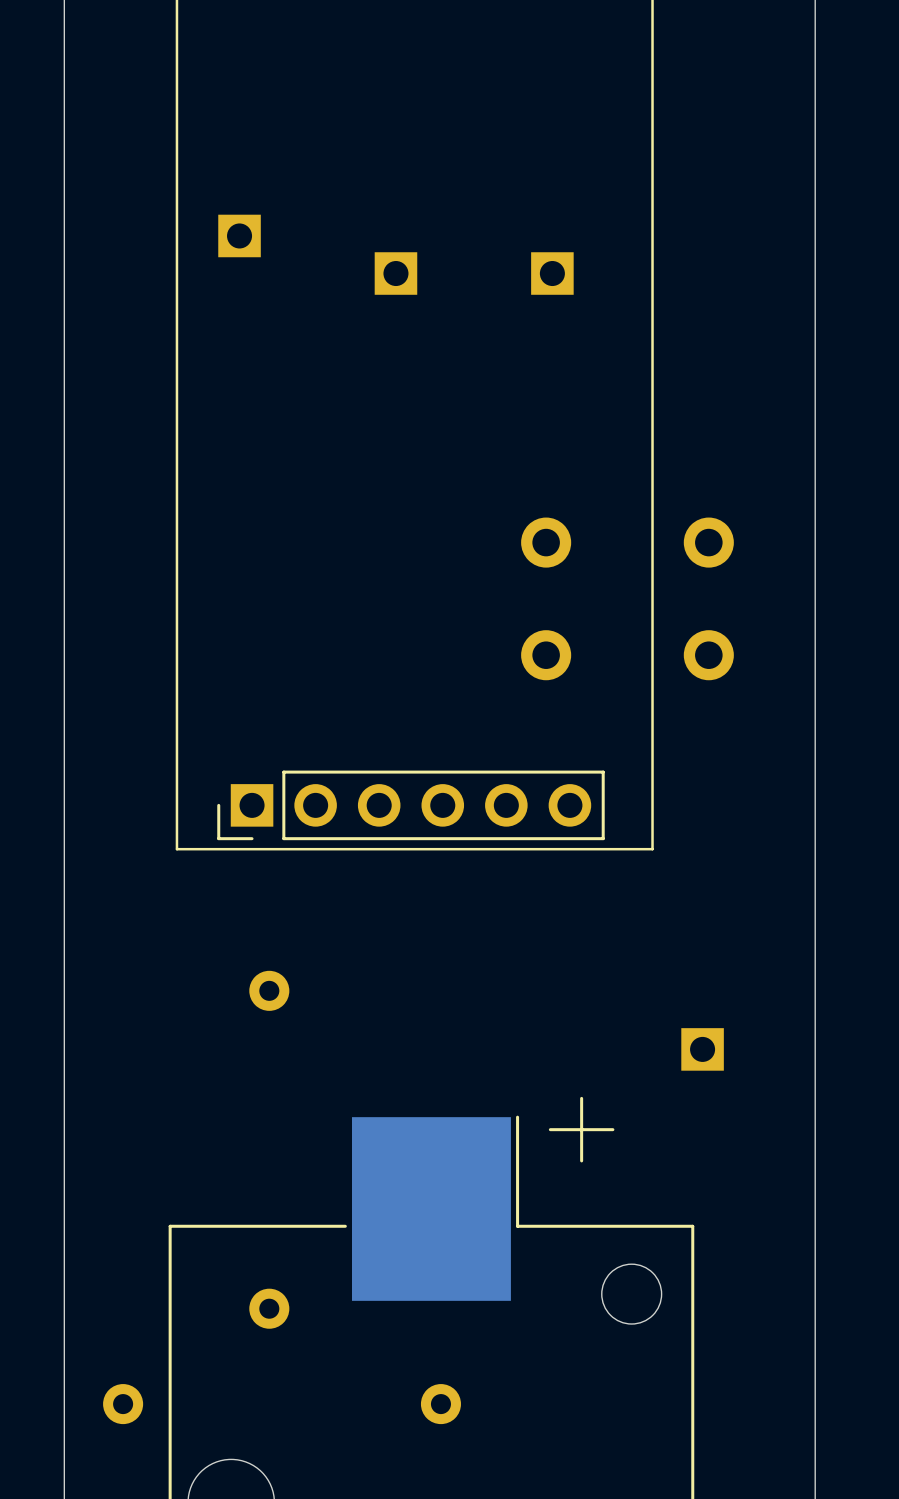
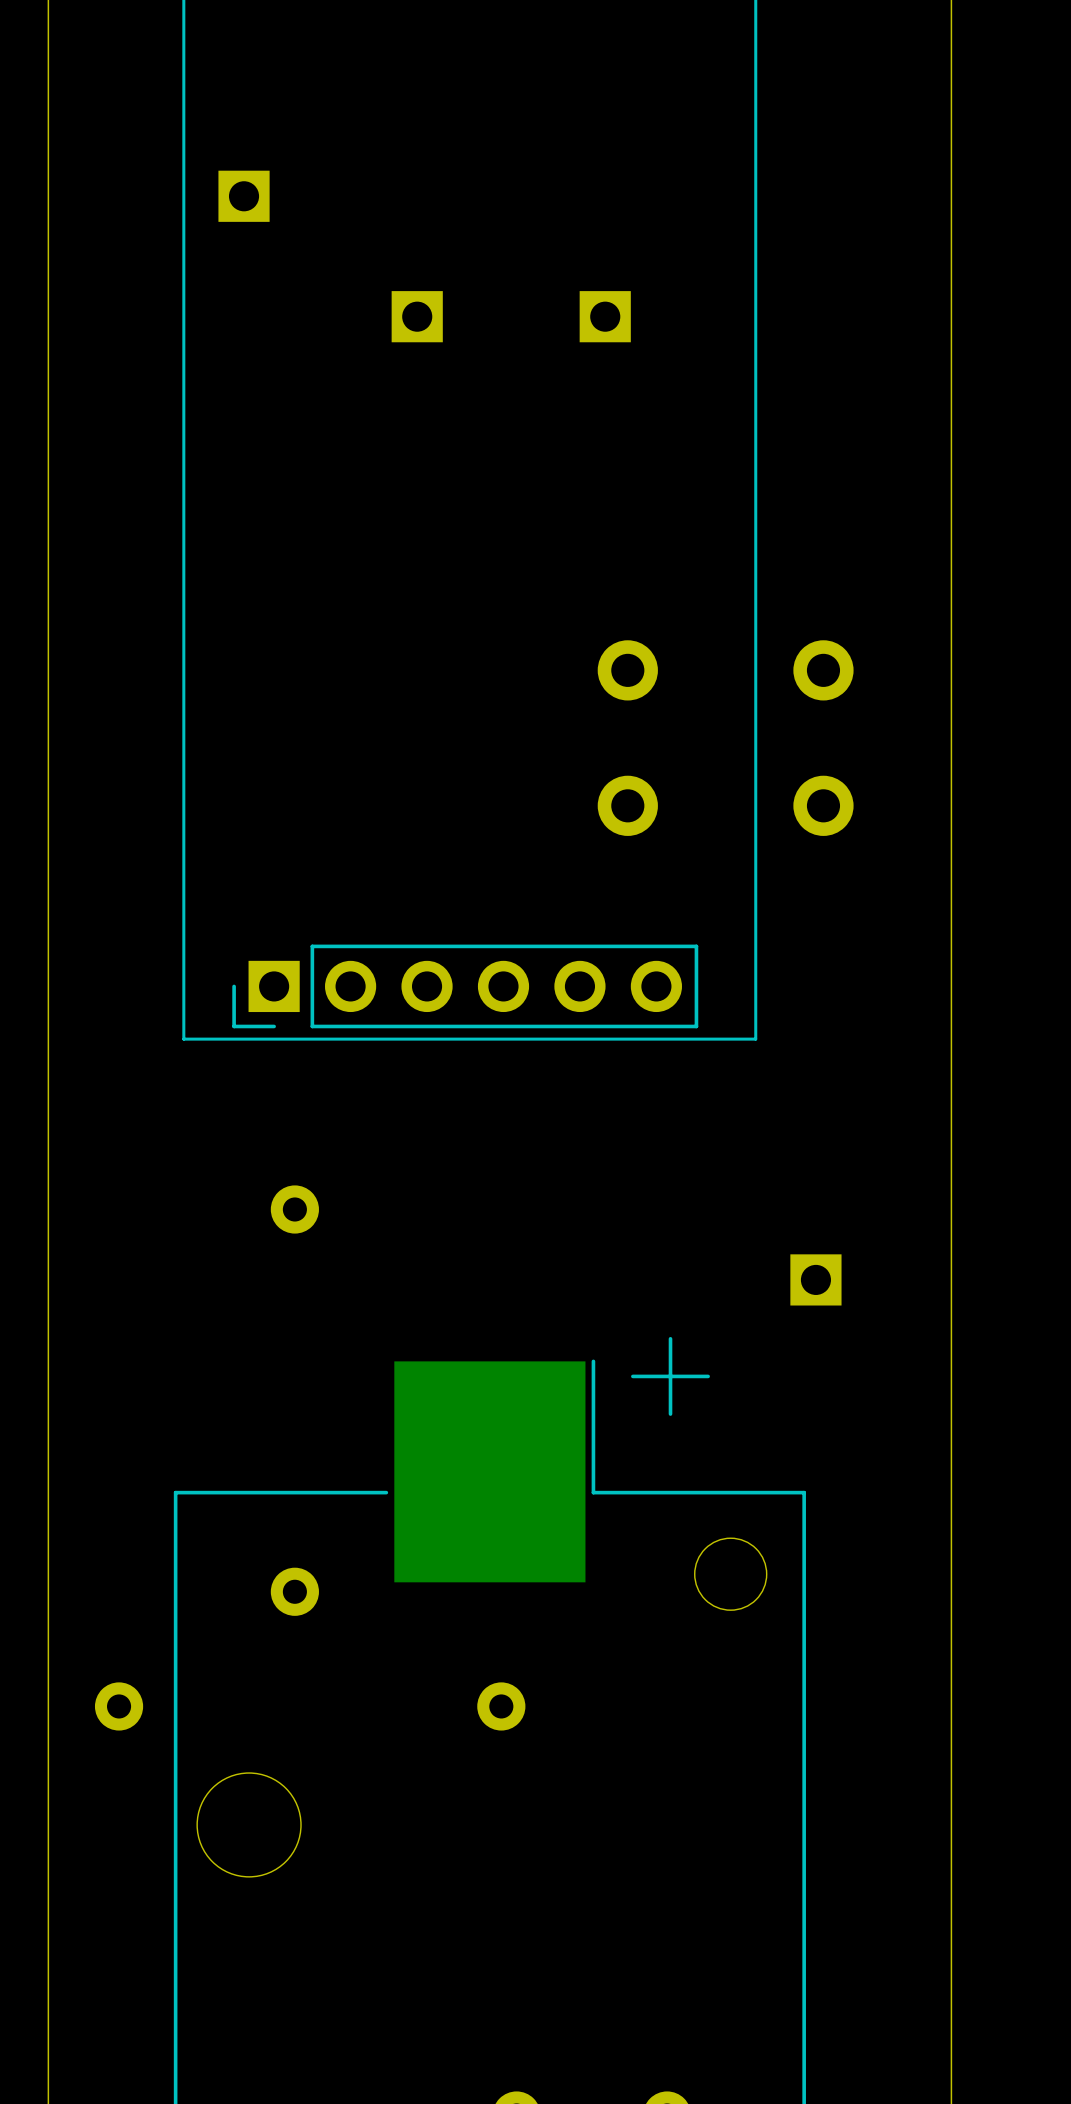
part: none -> (244, 196)
part: (239, 235) -> none
part position: (395, 273) -> (417, 316)
part position: (552, 273) -> (605, 316)

